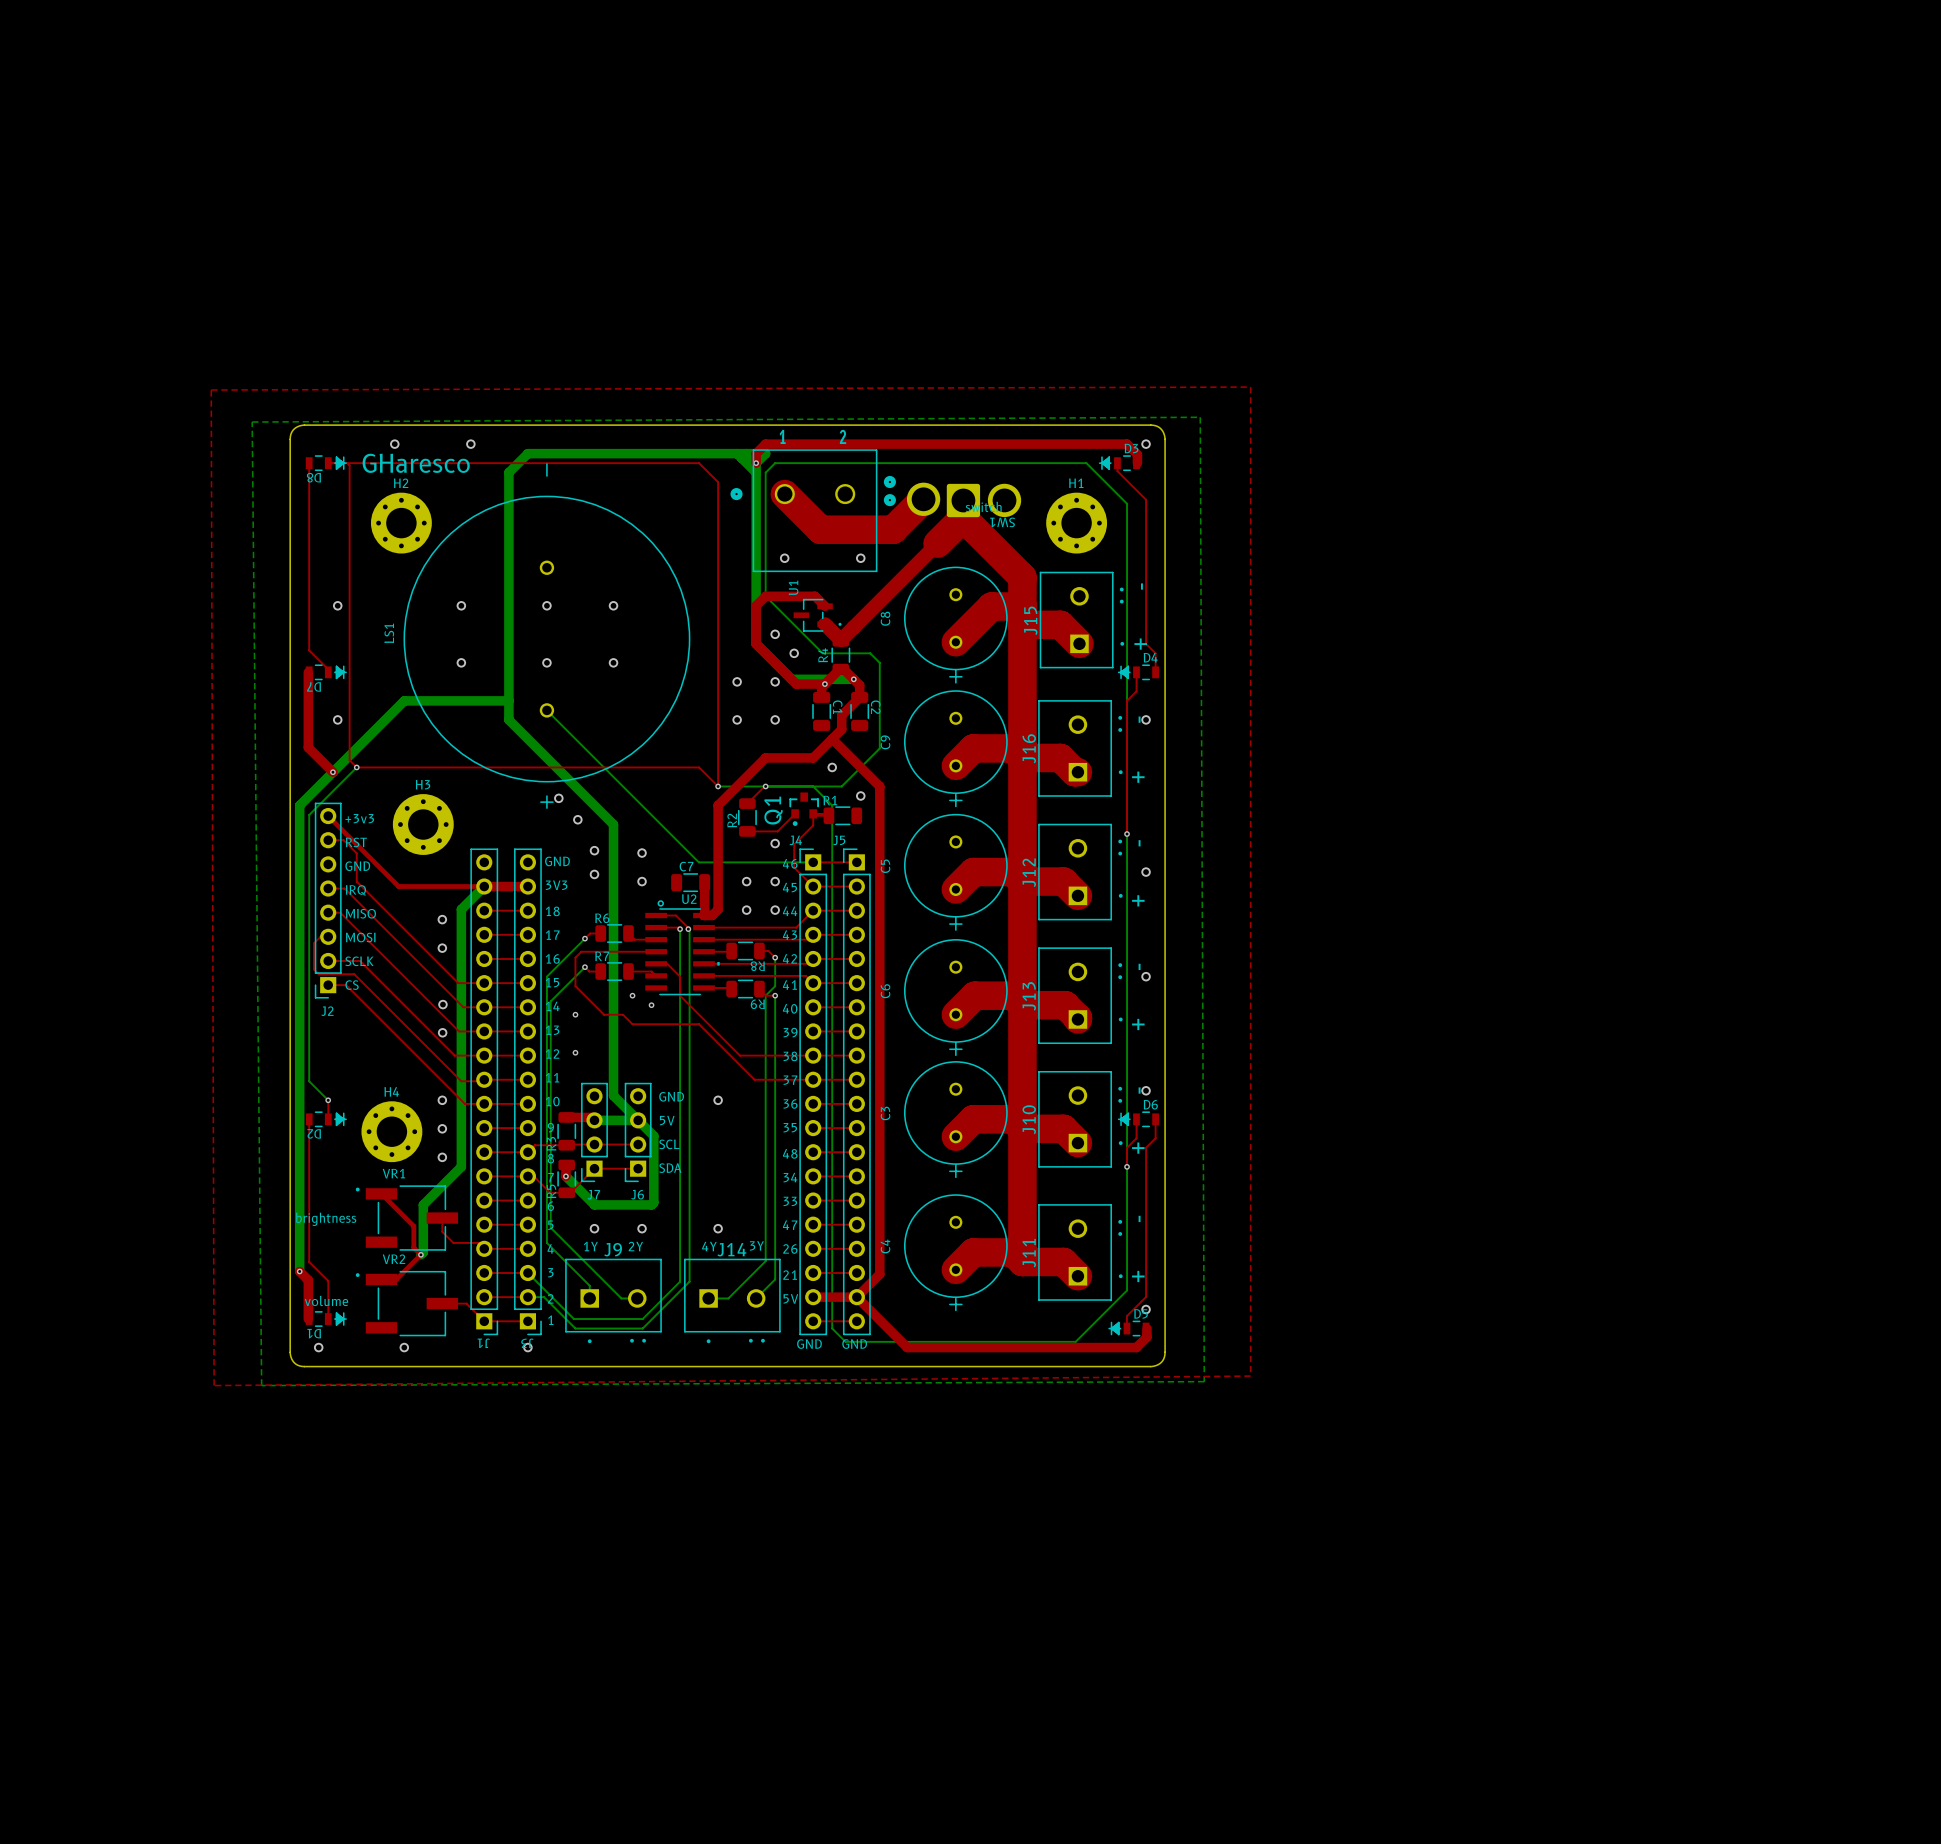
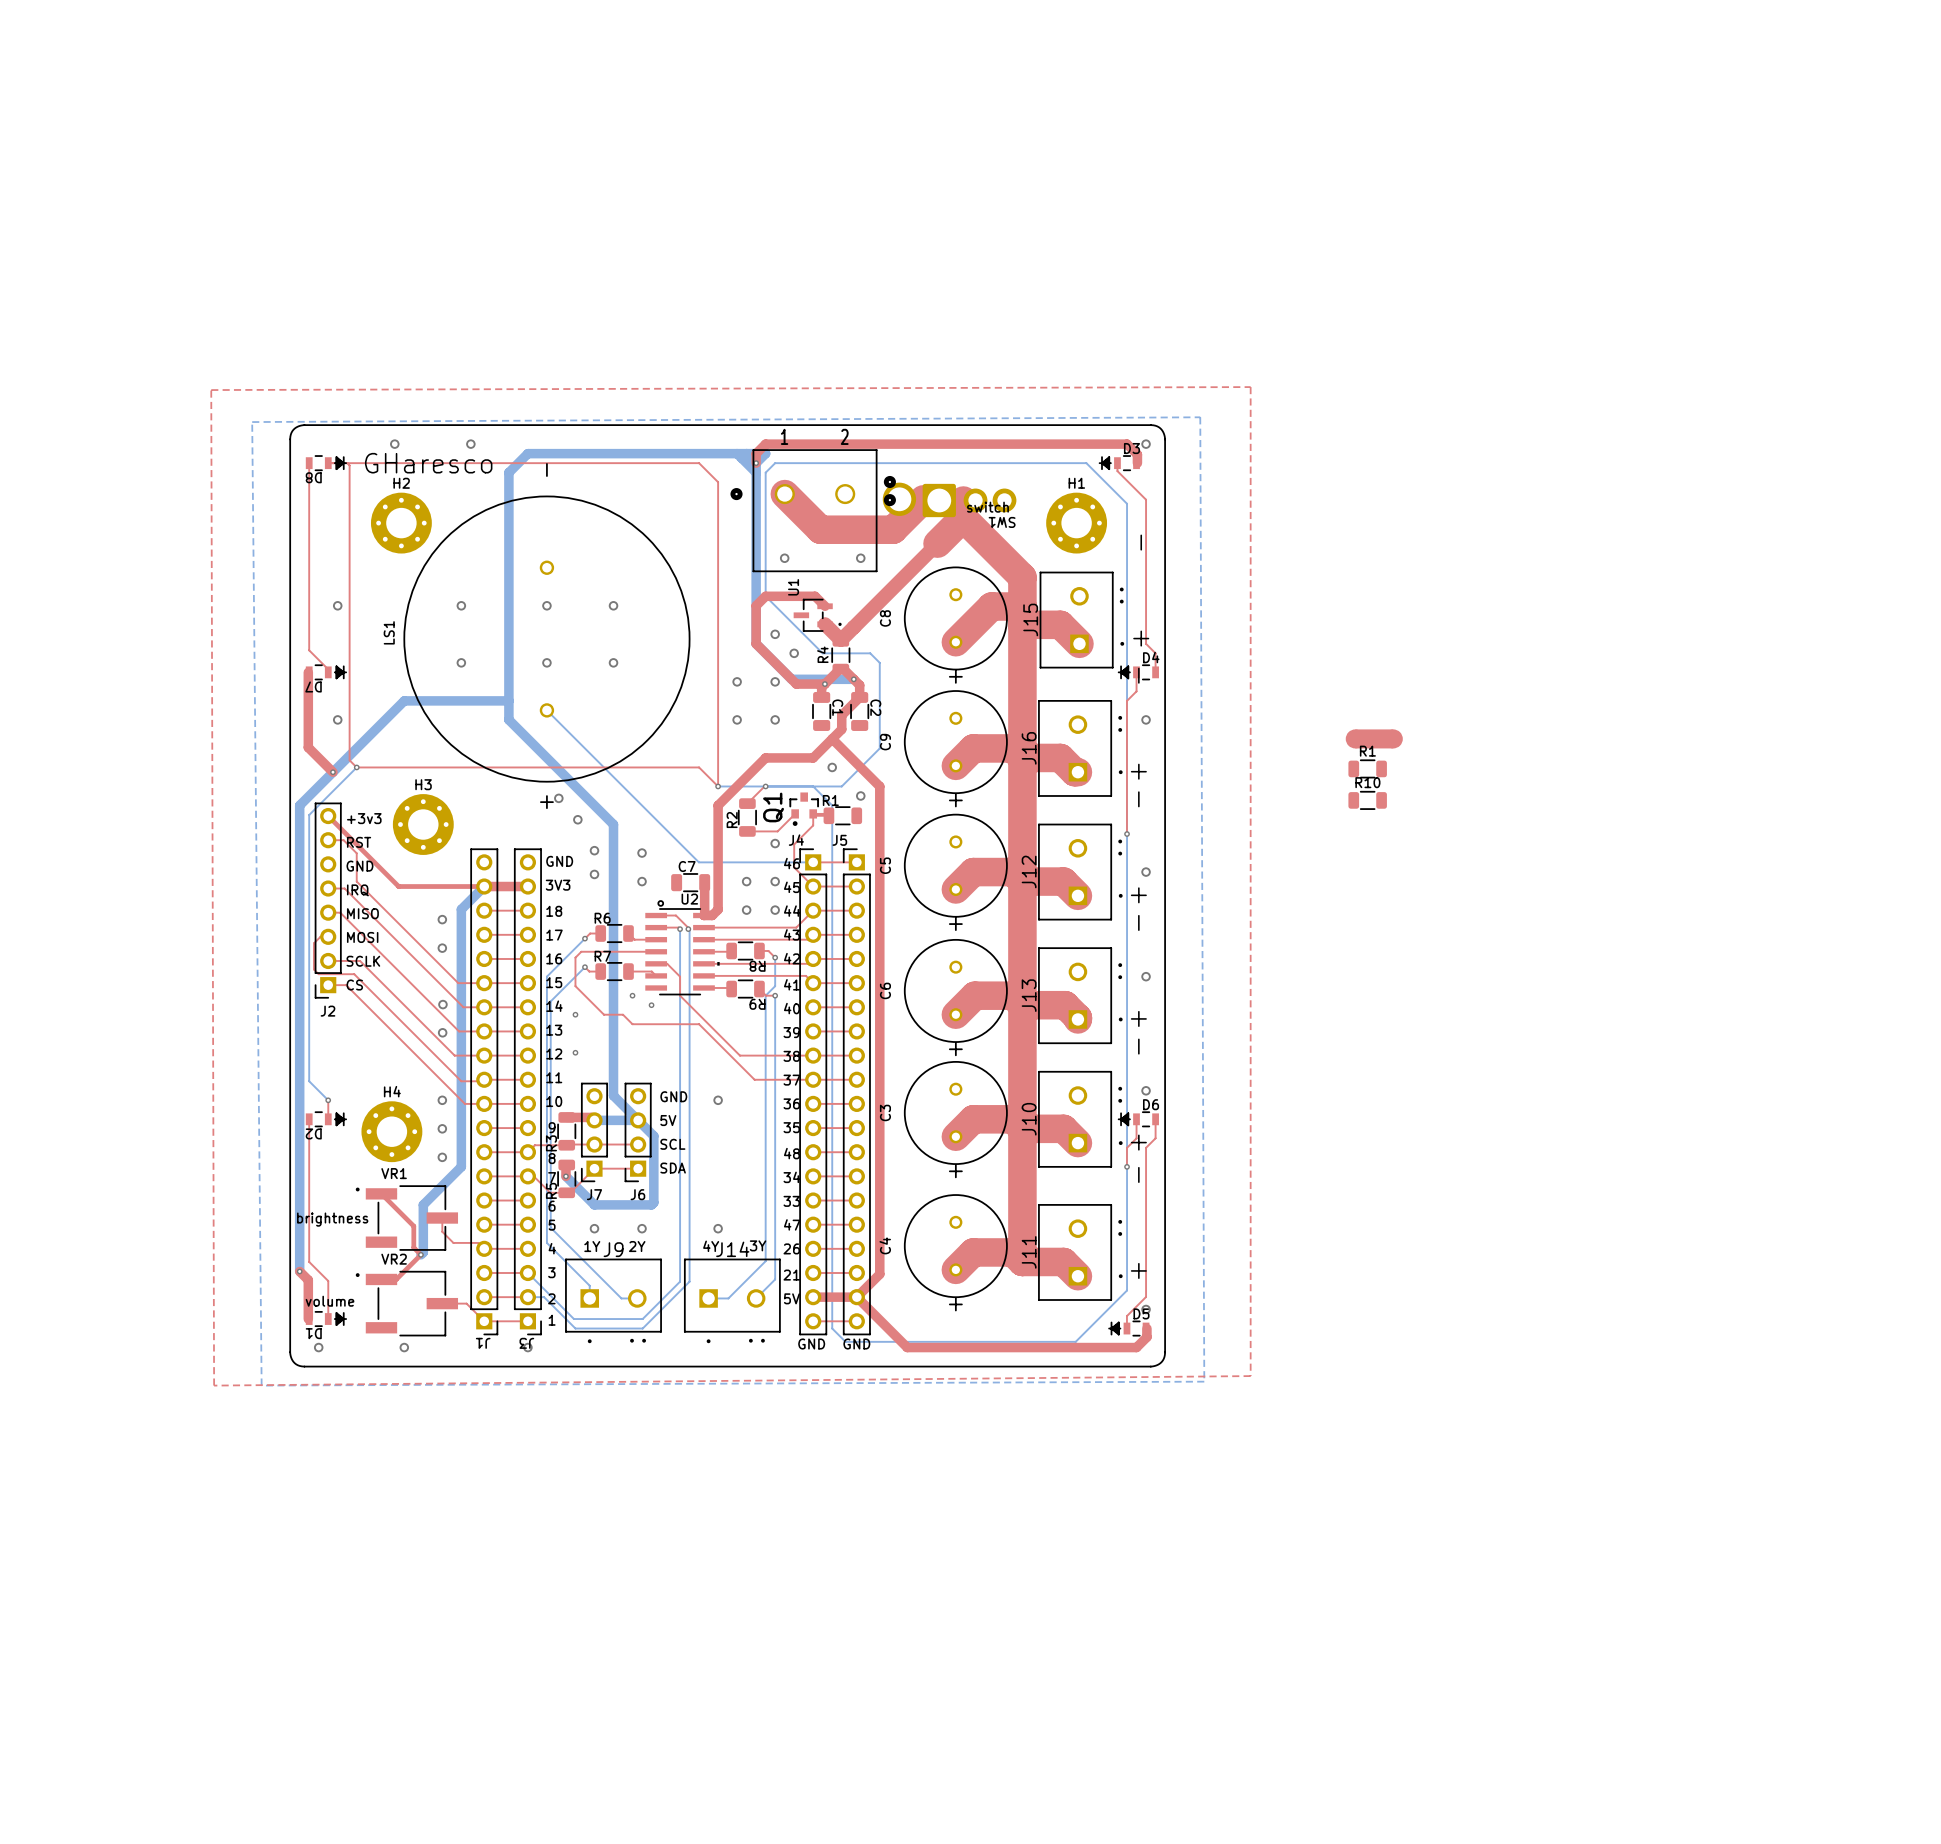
SW1 footprint: [906, 482, 1022, 518] -> [882, 482, 1017, 518]
part: none -> (1374, 738)
R1: none -> (1367, 768)
R10: none -> (1367, 800)

